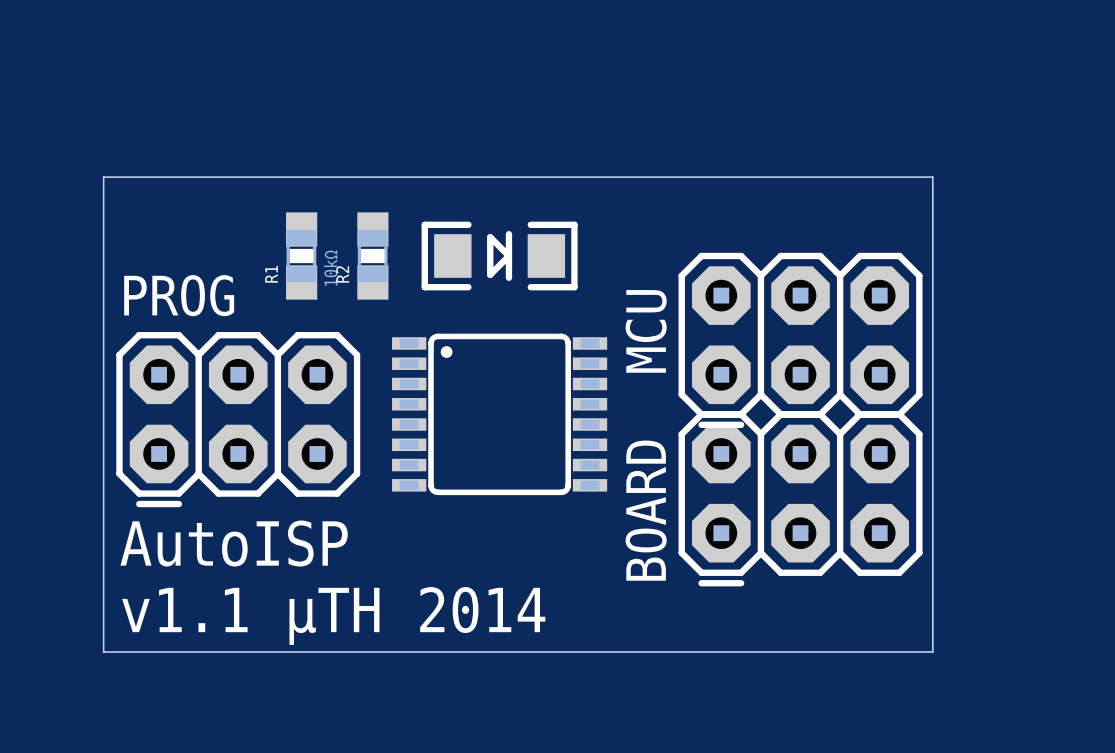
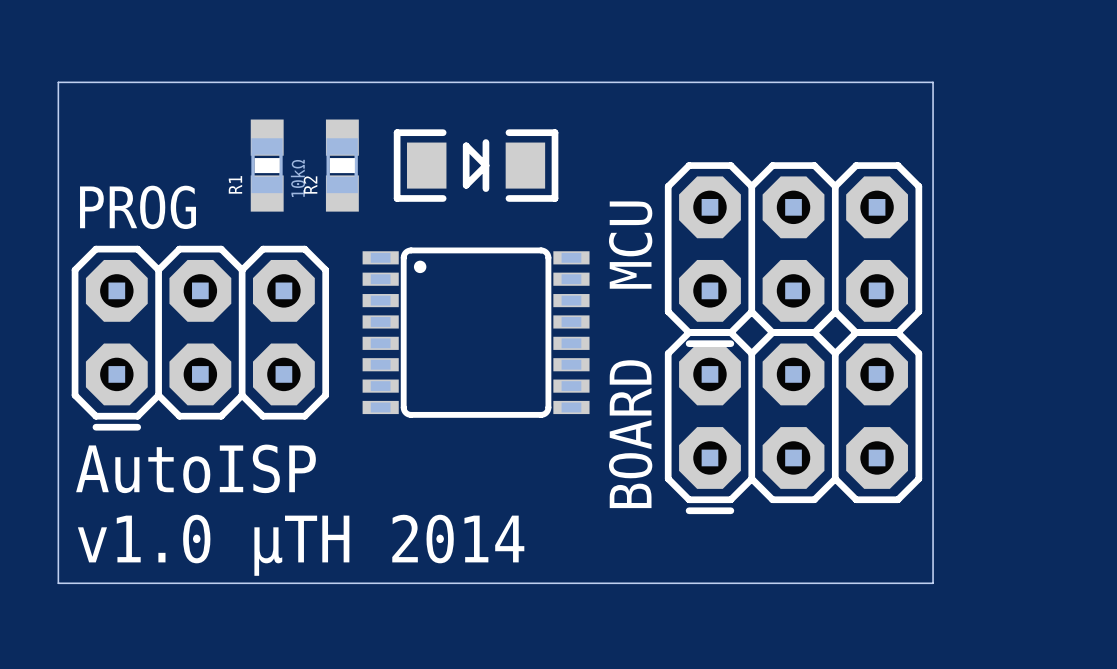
text: v1.1 µTH 2014 (333, 615) -> v1.0 µTH 2014 (301, 545)

